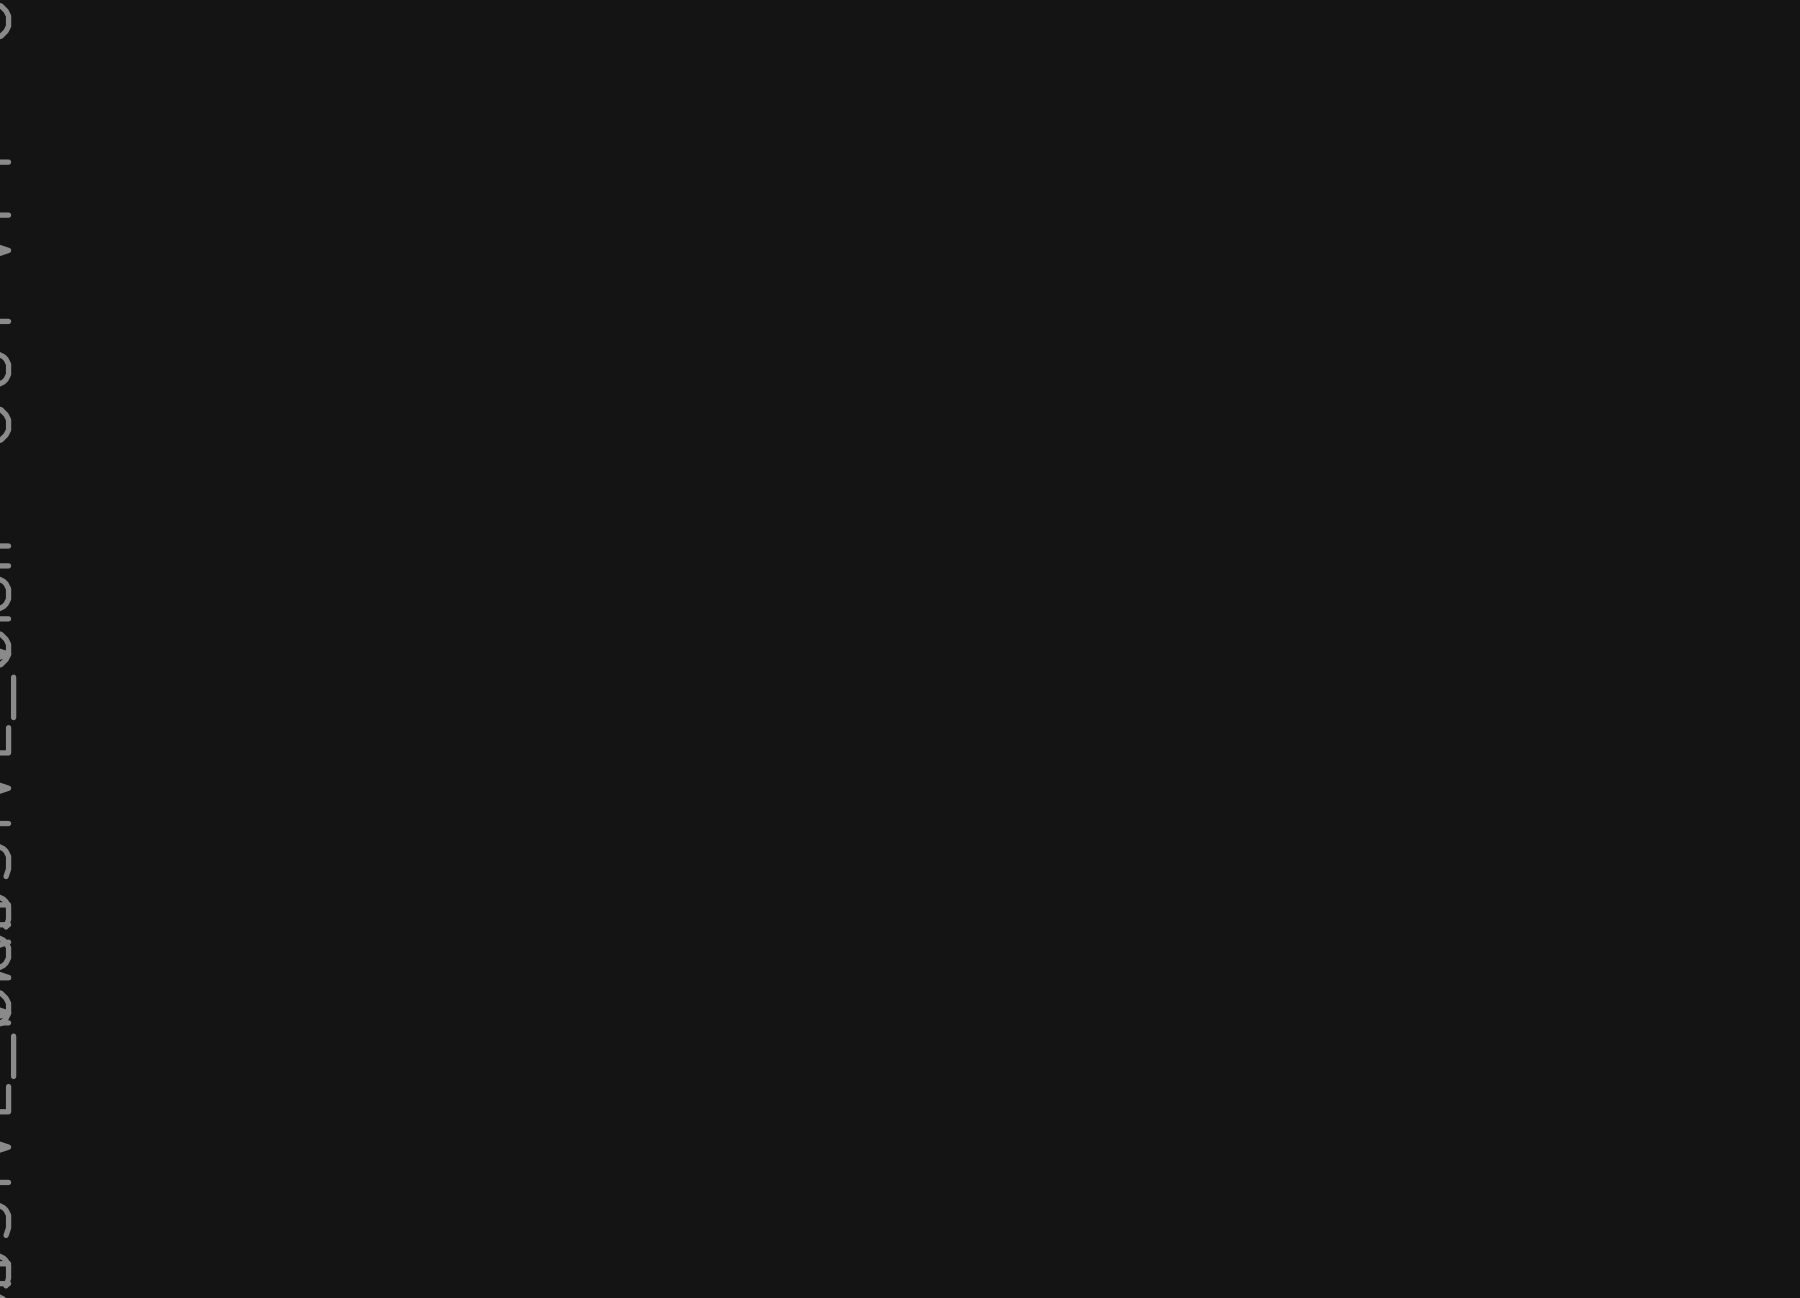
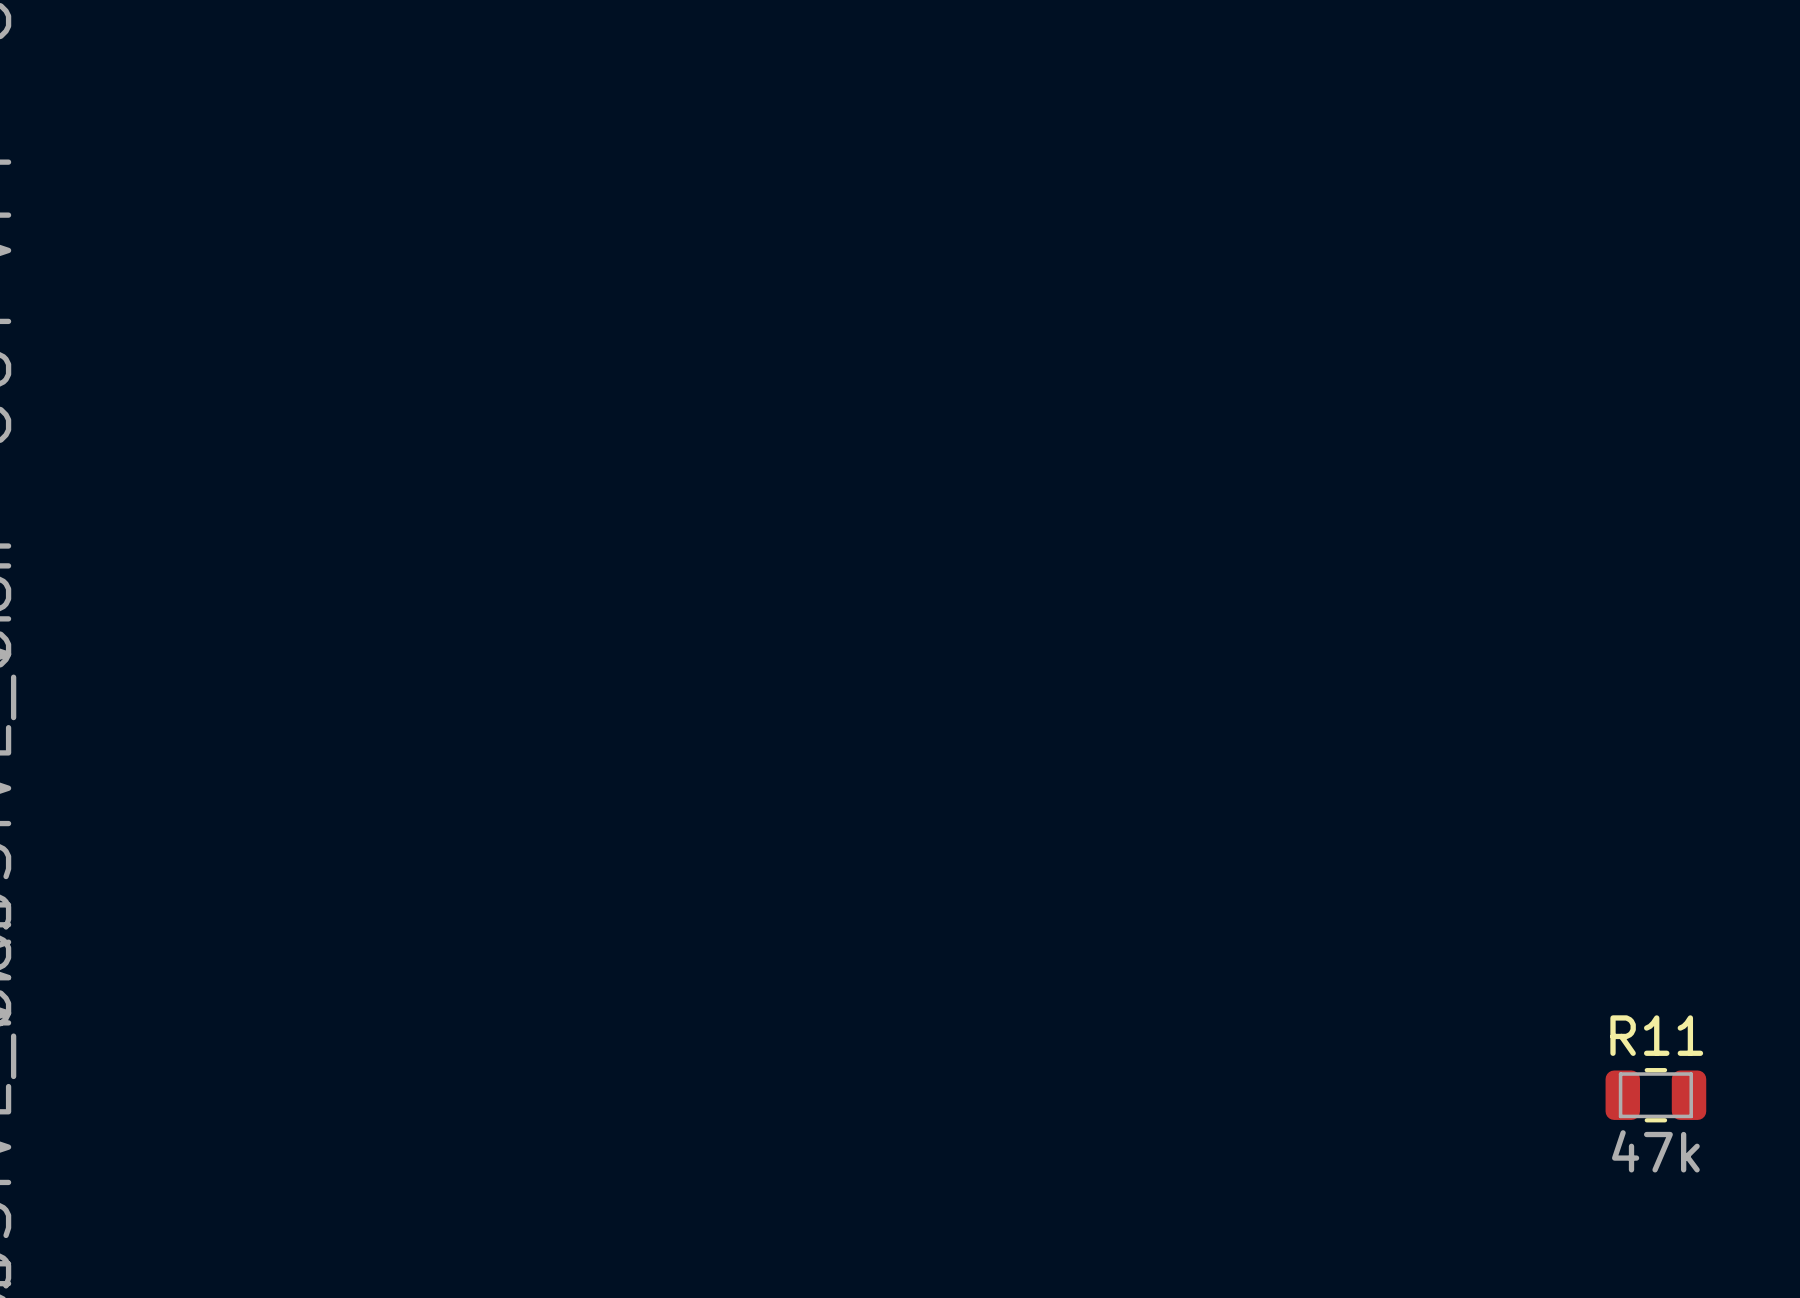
R11: none -> 47k (1655, 1095)

